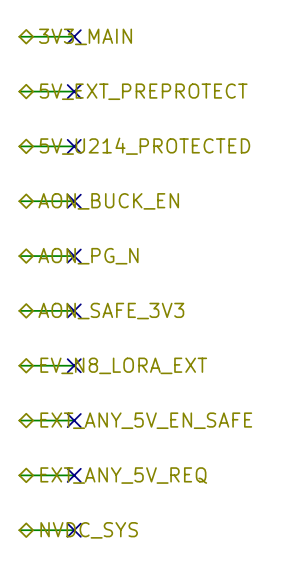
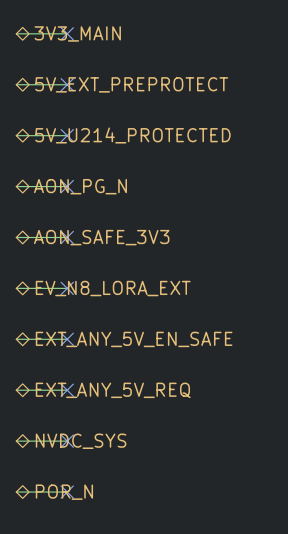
hierarchical label: AON_BUCK_EN (108, 201) -> AON_PG_N (80, 186)
hierarchical label: AON_PG_N (88, 256) -> AON_SAFE_3V3 (101, 237)
hierarchical label: AON_SAFE_3V3 (111, 311) -> EV_N8_LORA_EXT (113, 288)
hierarchical label: EV_N8_LORA_EXT (123, 365) -> EXT_ANY_5V_EN_SAFE (134, 339)
hierarchical label: EXT_ANY_5V_EN_SAFE (146, 420) -> EXT_ANY_5V_REQ (113, 390)
hierarchical label: EXT_ANY_5V_REQ (123, 475) -> NVDC_SYS (81, 441)
hierarchical label: NVDC_SYS (89, 530) -> POR_N (64, 492)

